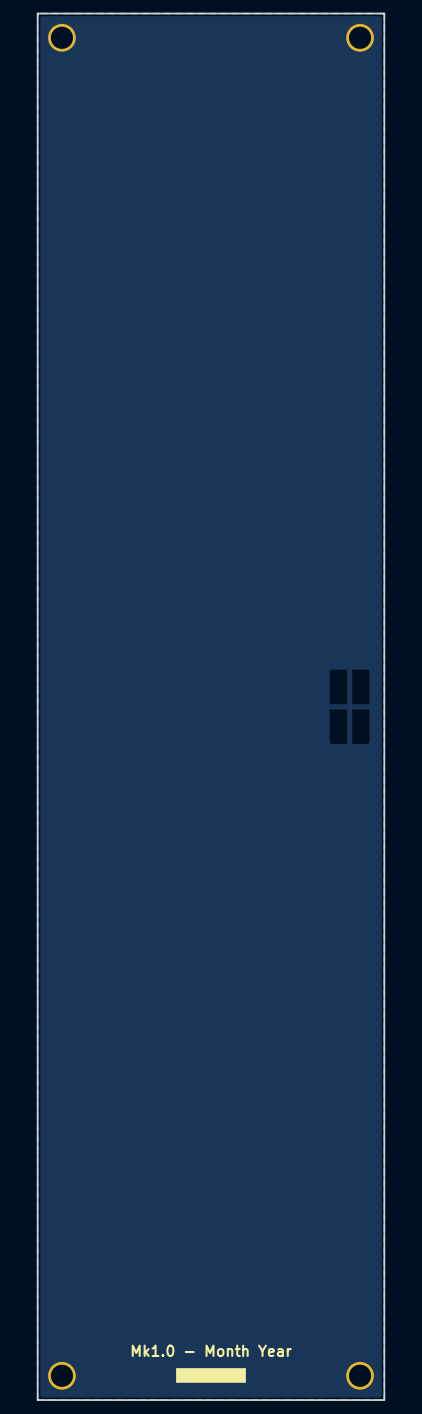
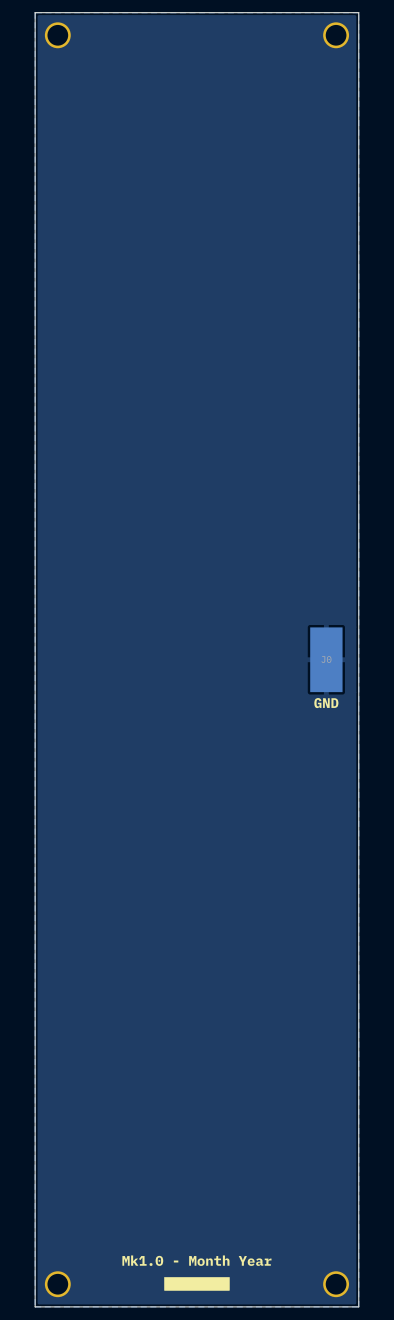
part: none -> (326, 659)

